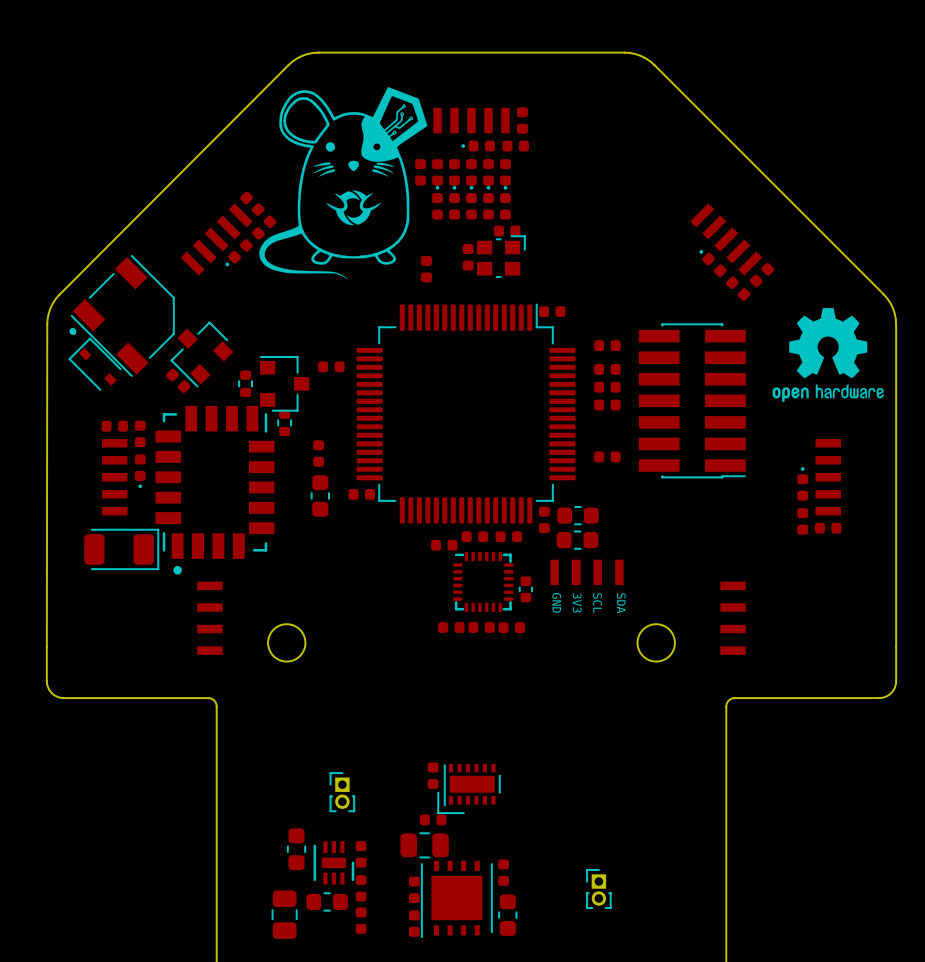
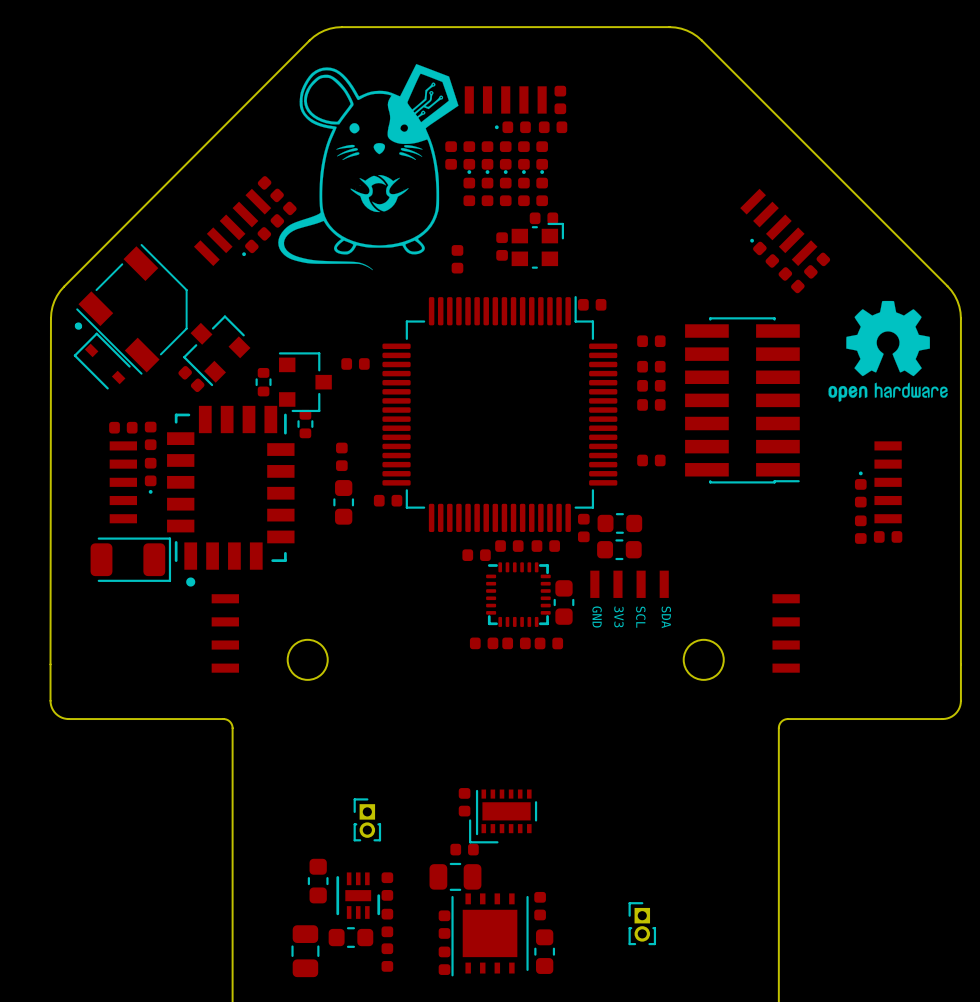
part footprint: [518, 576, 533, 603] -> [553, 580, 575, 625]

